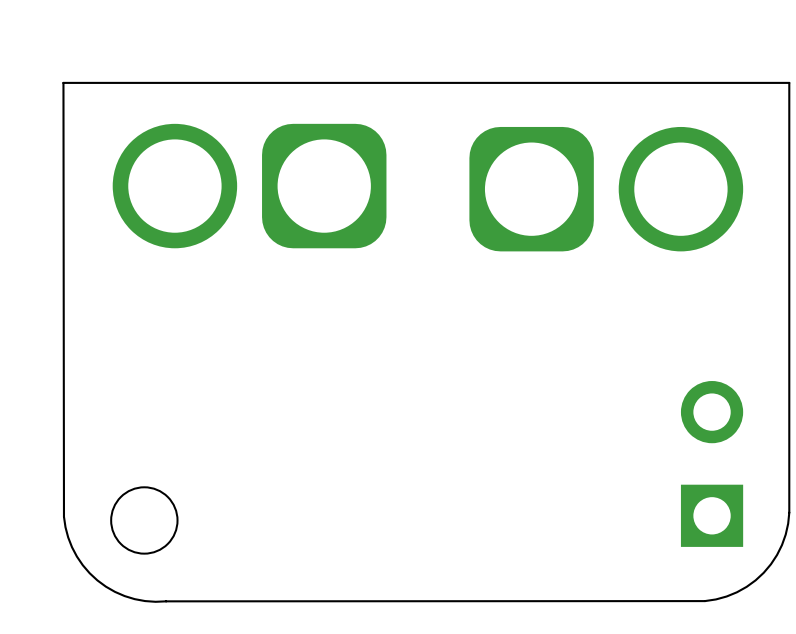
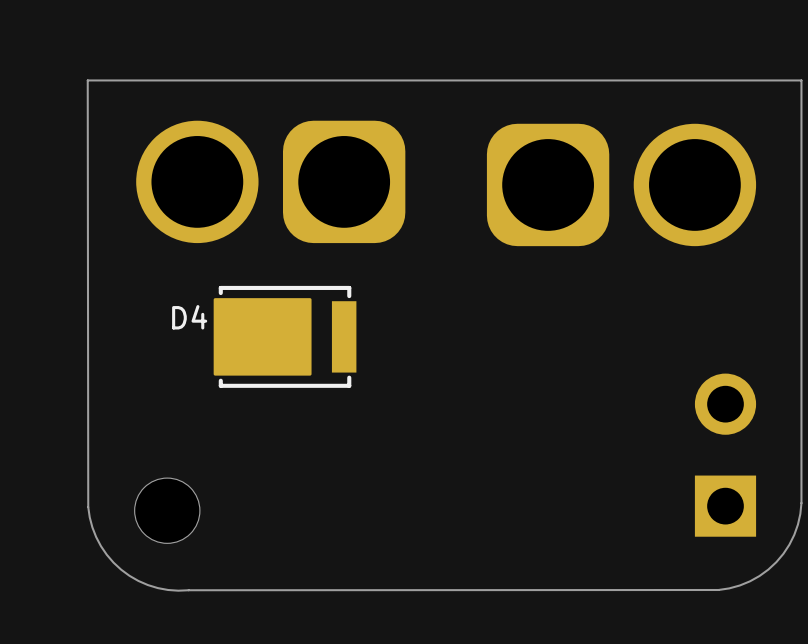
D4: none -> (285, 336)

